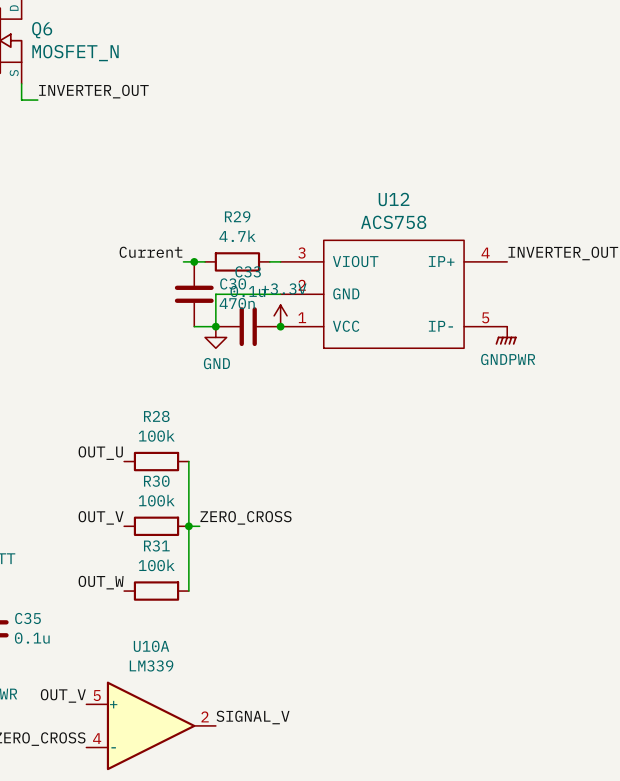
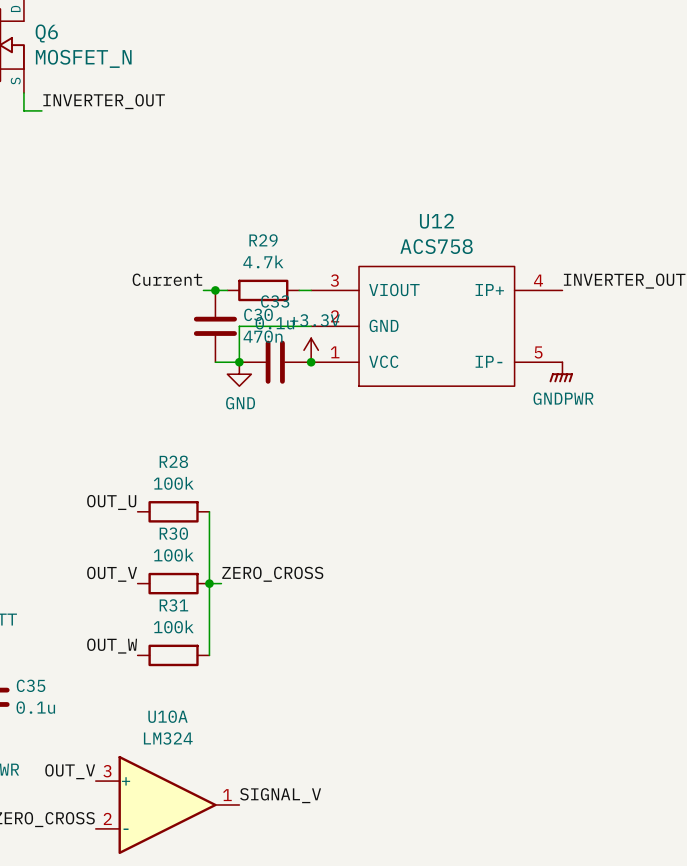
U10A value: LM339 (151, 665) -> LM324 (168, 738)
U10A pin number: 5 (97, 695) -> 3 (107, 771)
U10A pin number: 2 (205, 716) -> 1 (227, 795)
U10A pin number: 4 (97, 738) -> 2 (107, 818)

